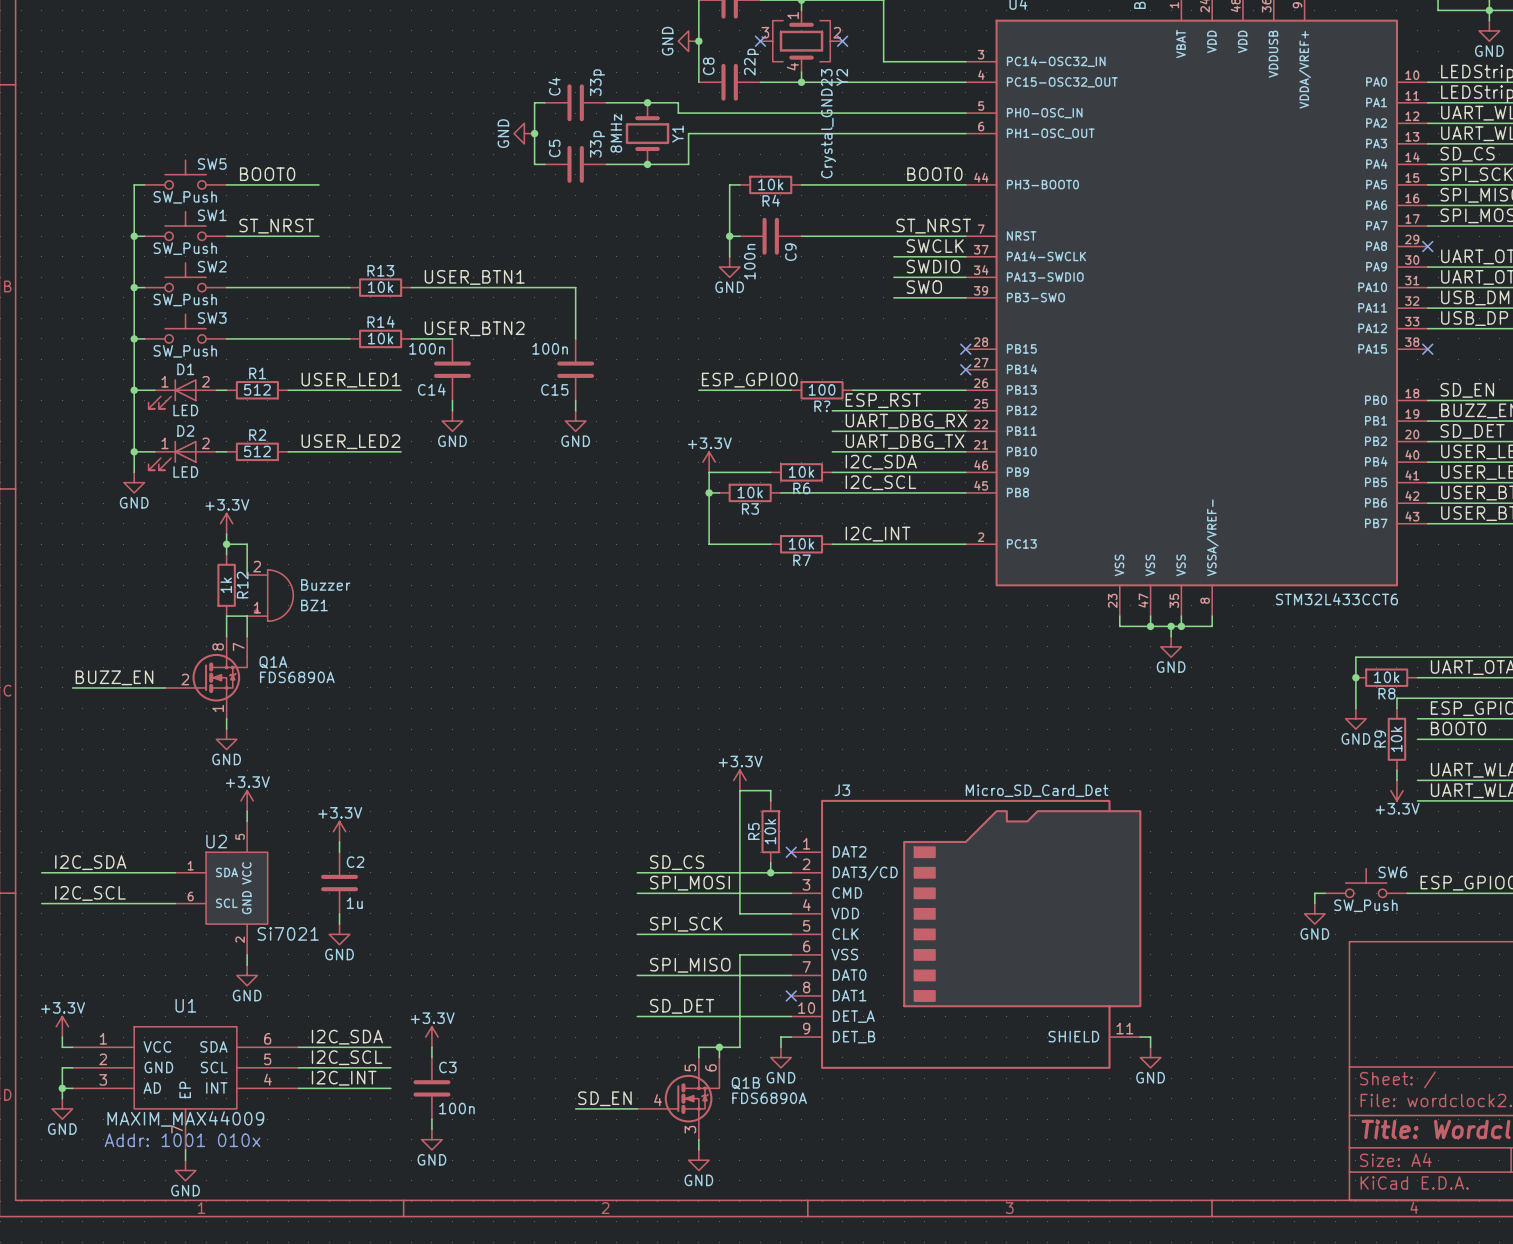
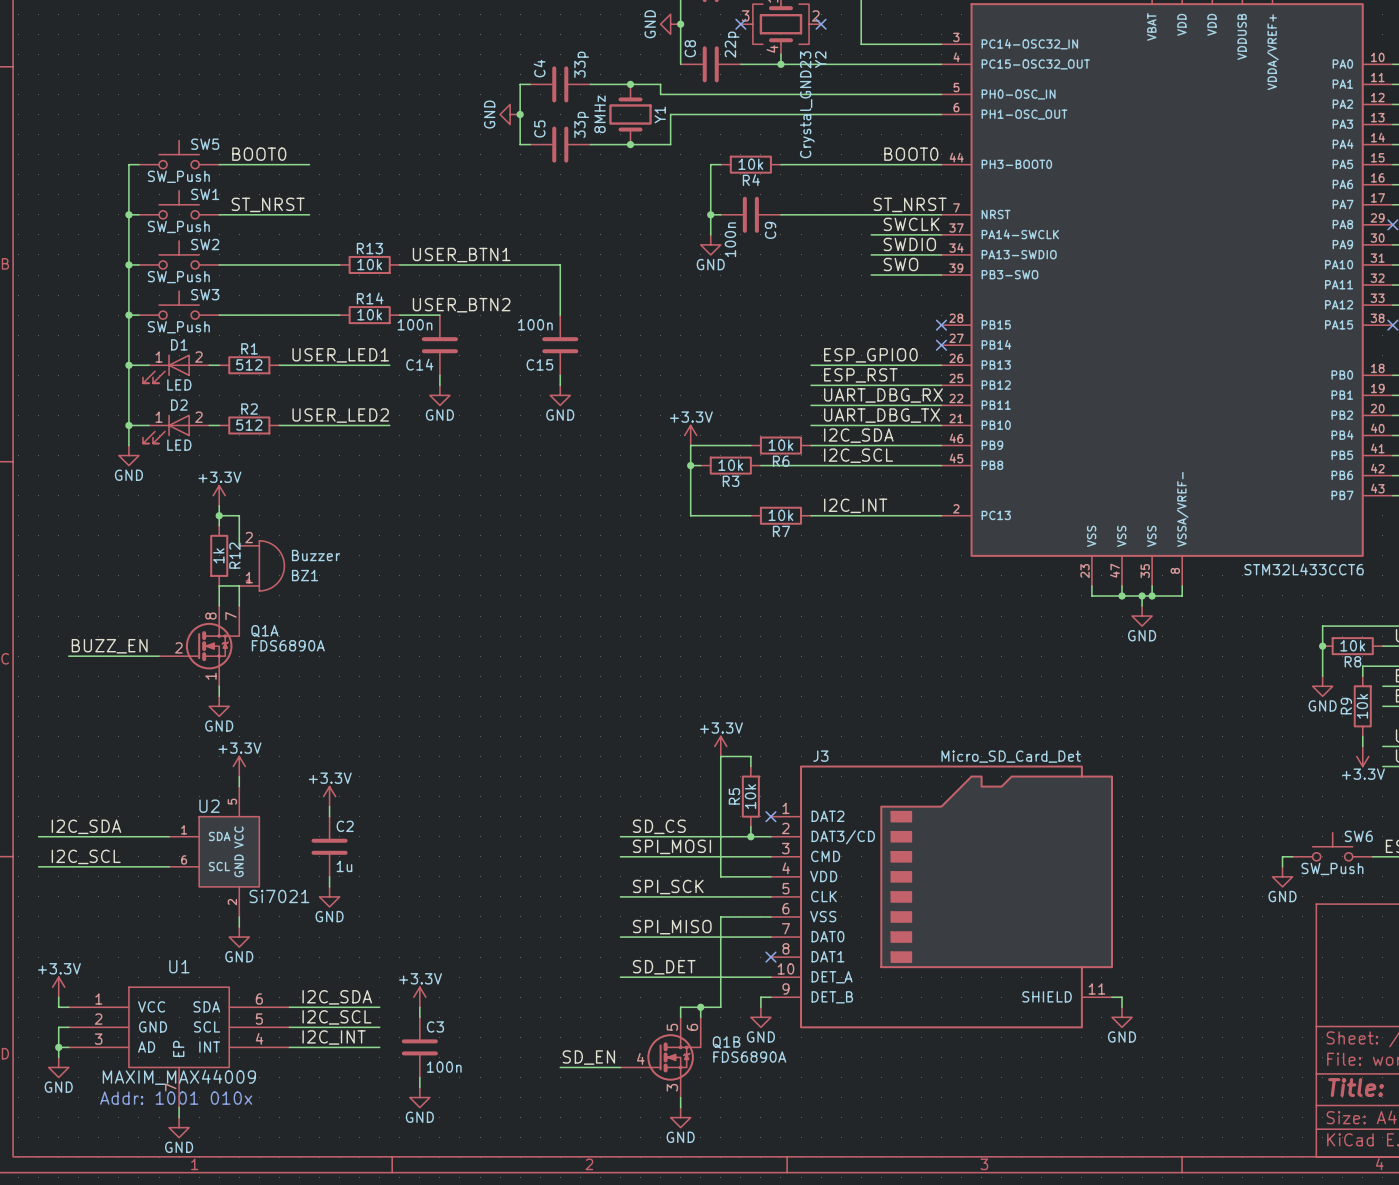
label position: ESP_GPIO0 (749, 380) -> ESP_GPIO0 (870, 355)
wire: (698, 390) (791, 390) -> none
R?: 100 (822, 390) -> none

